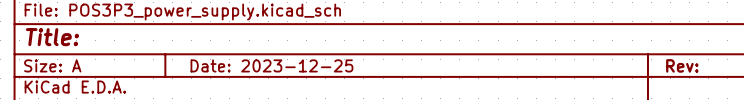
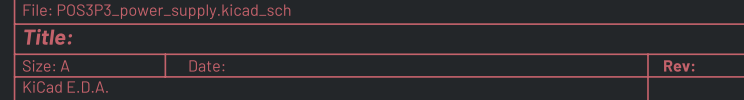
title block: Date: 2023-12-25 (271, 65) -> Date: (206, 65)

